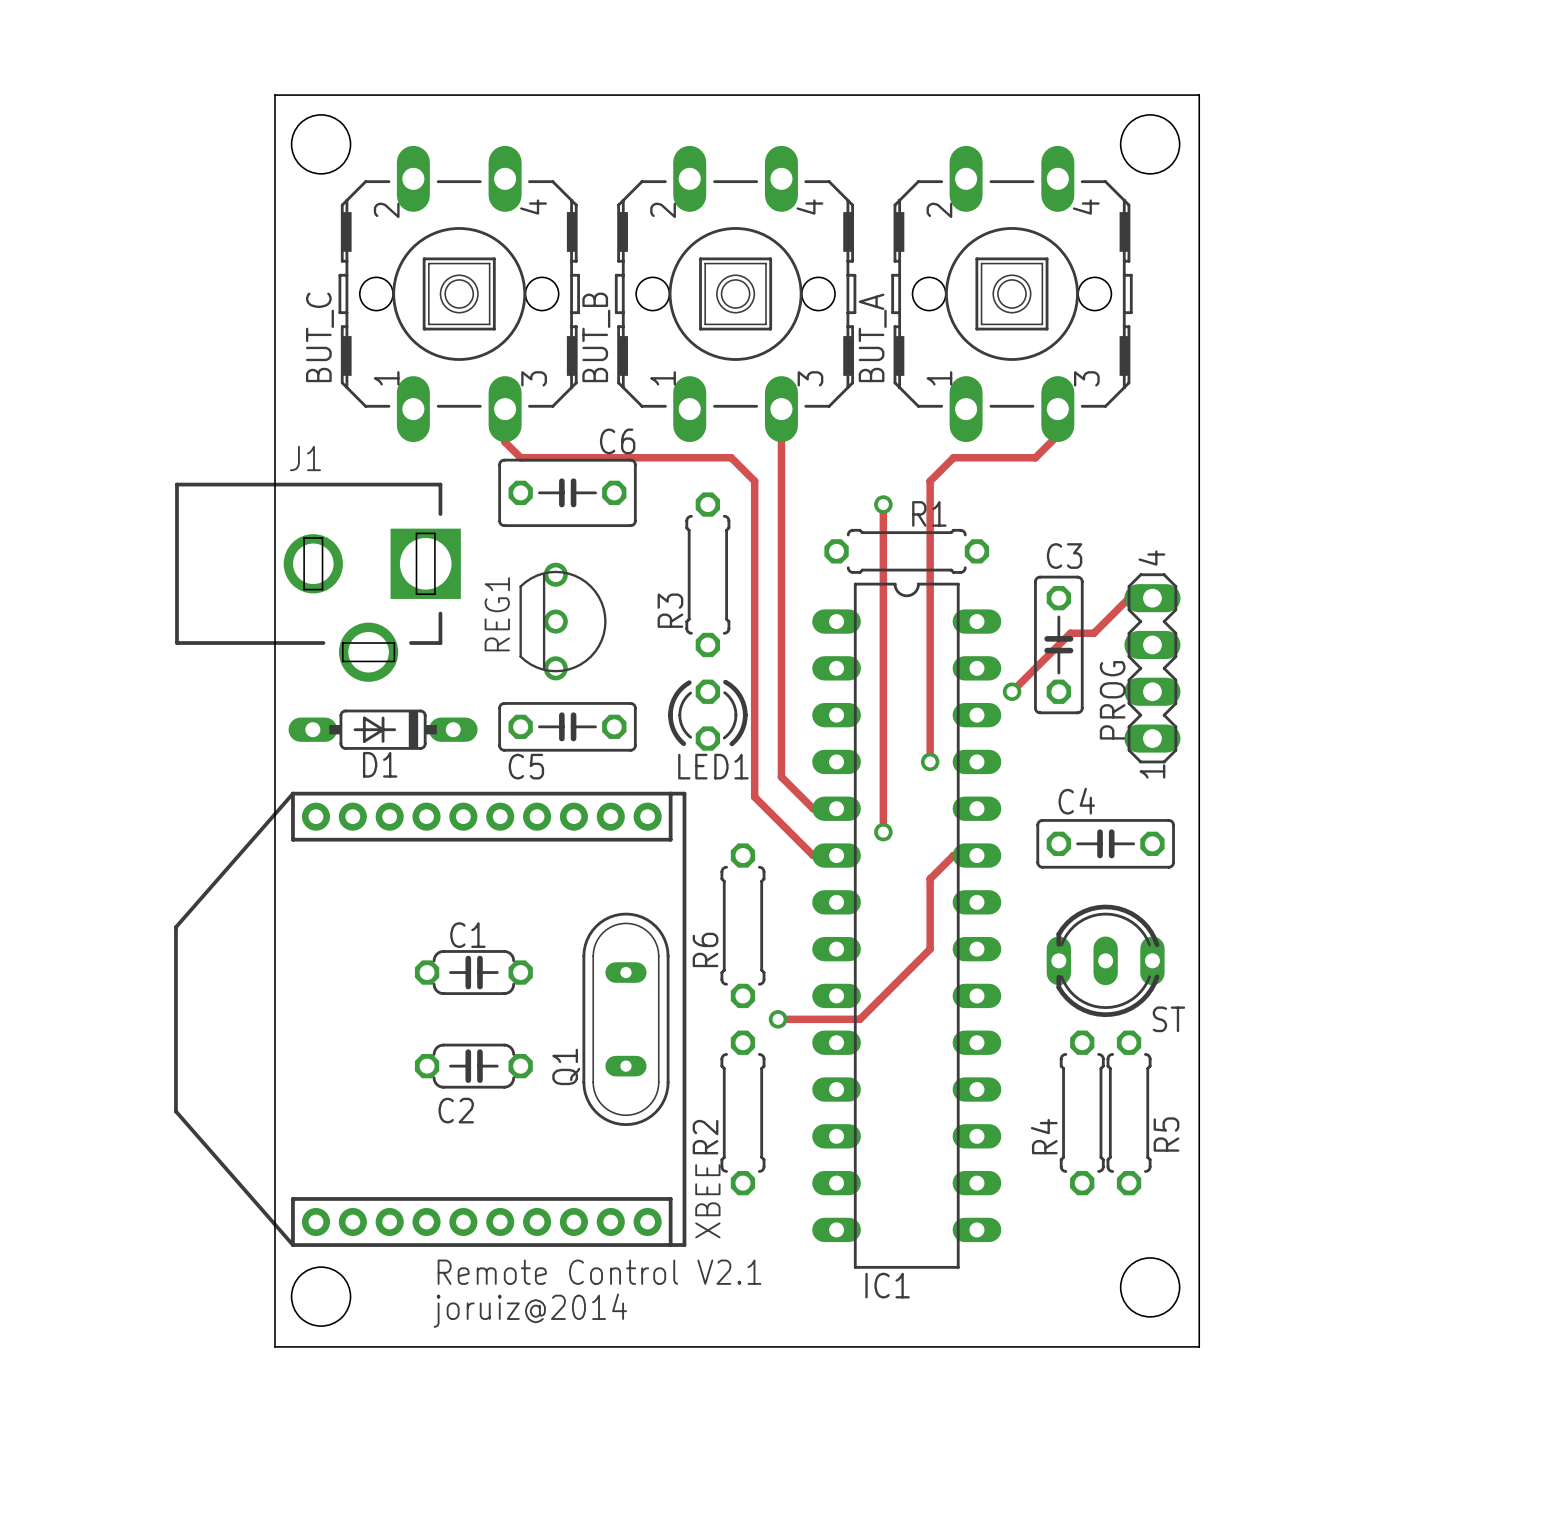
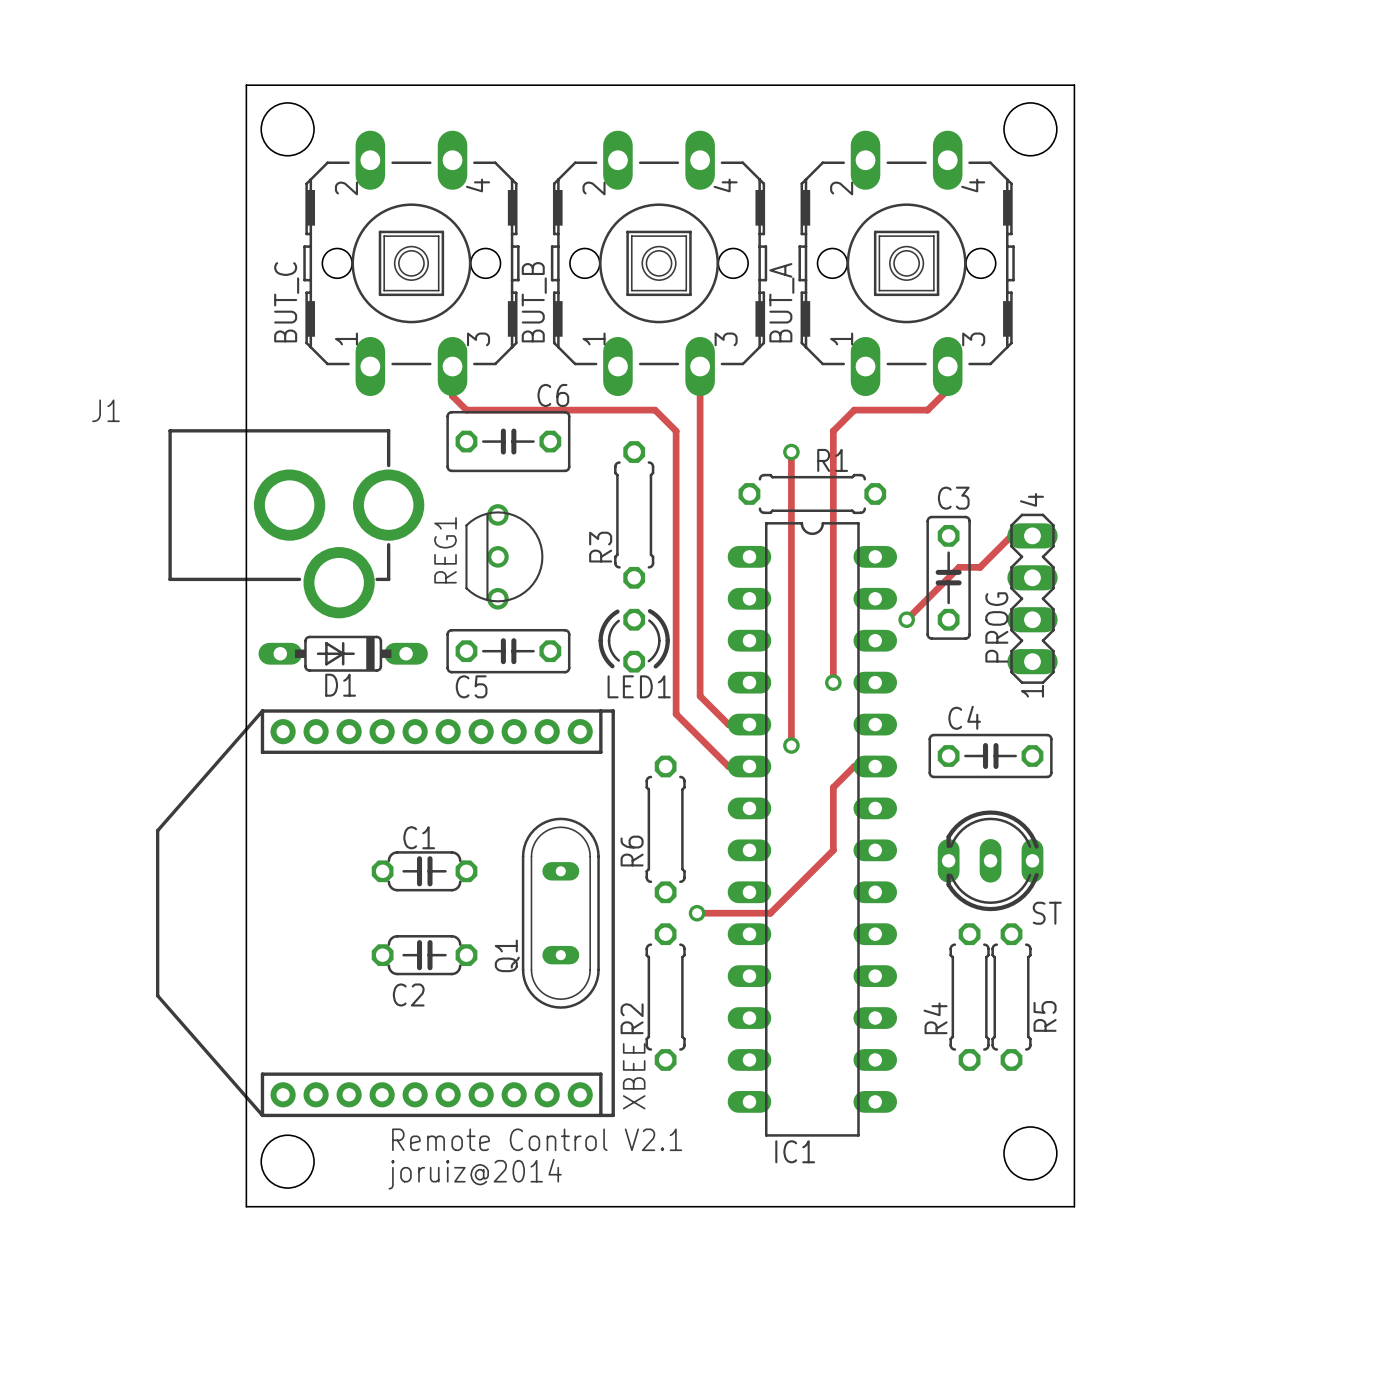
J1 name position: J1 (305, 458) -> J1 (105, 410)
J1 footprint: [175, 482, 461, 682] -> [168, 429, 425, 619]

